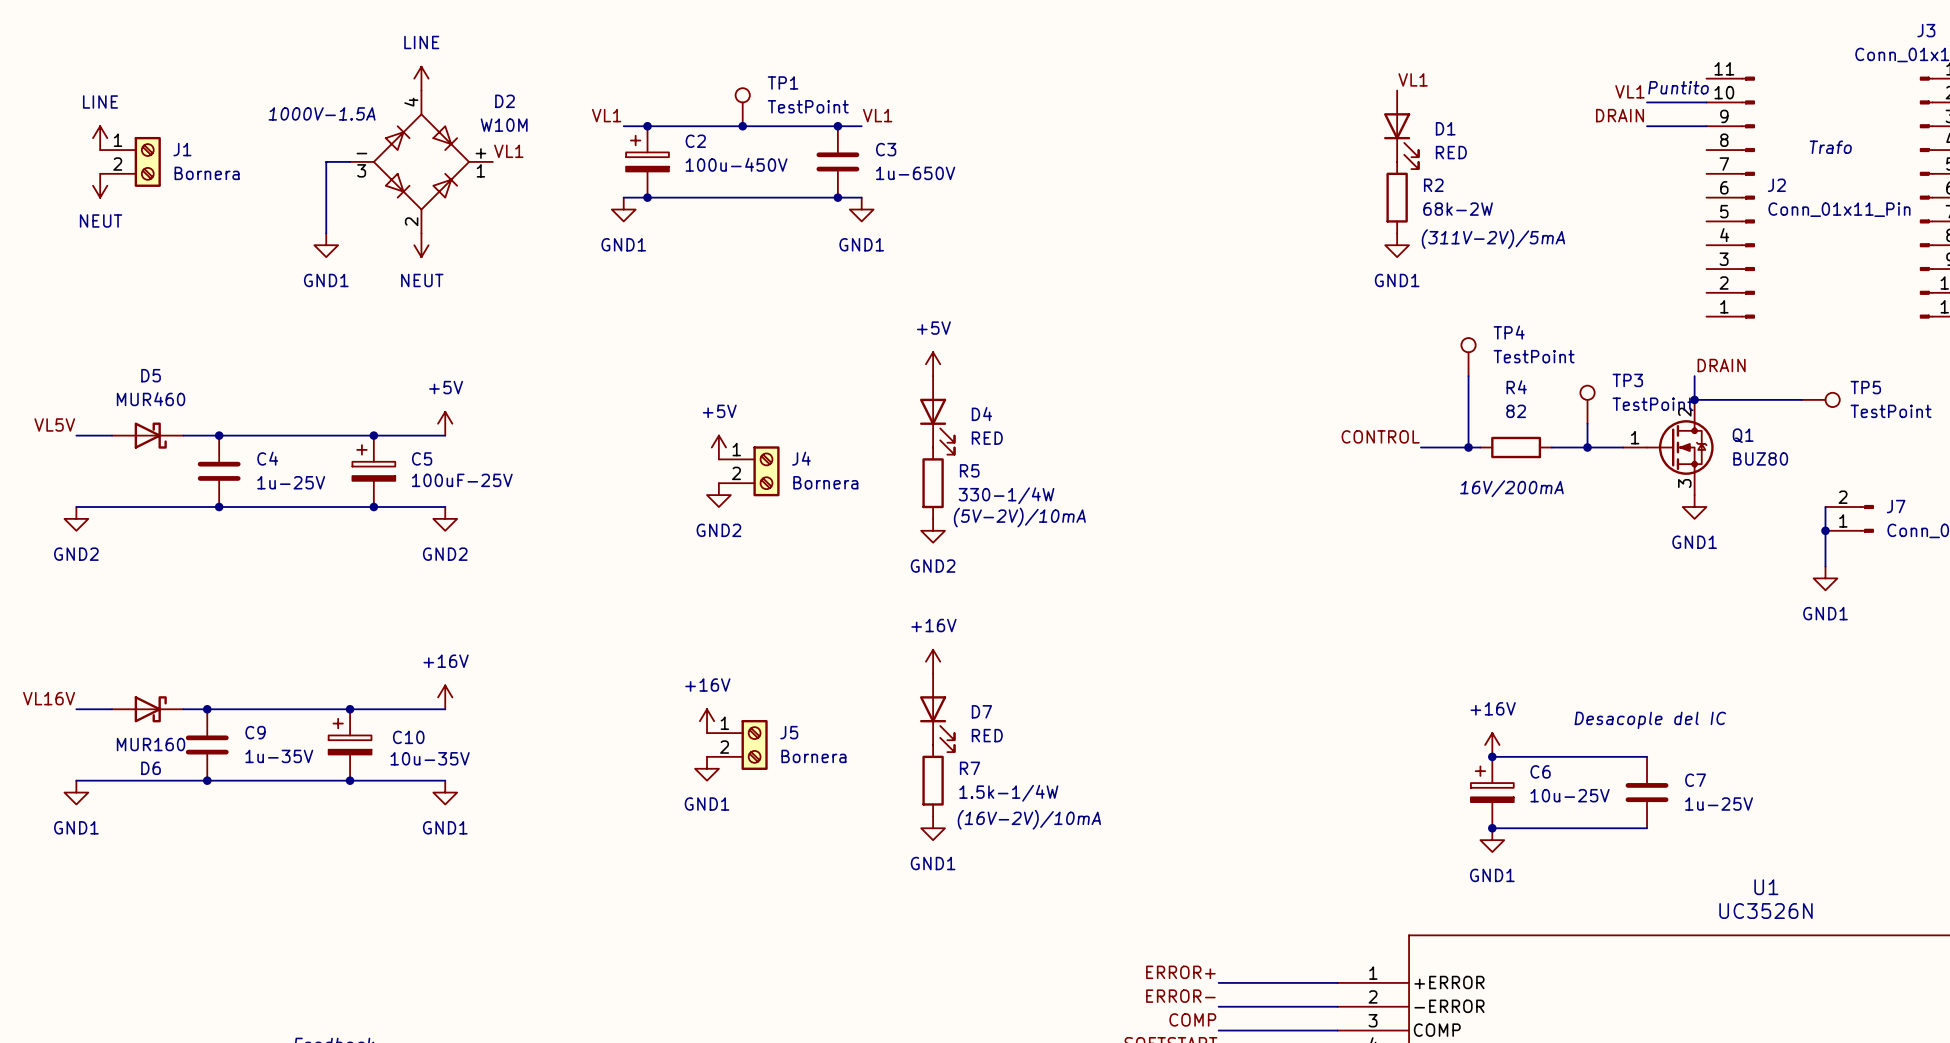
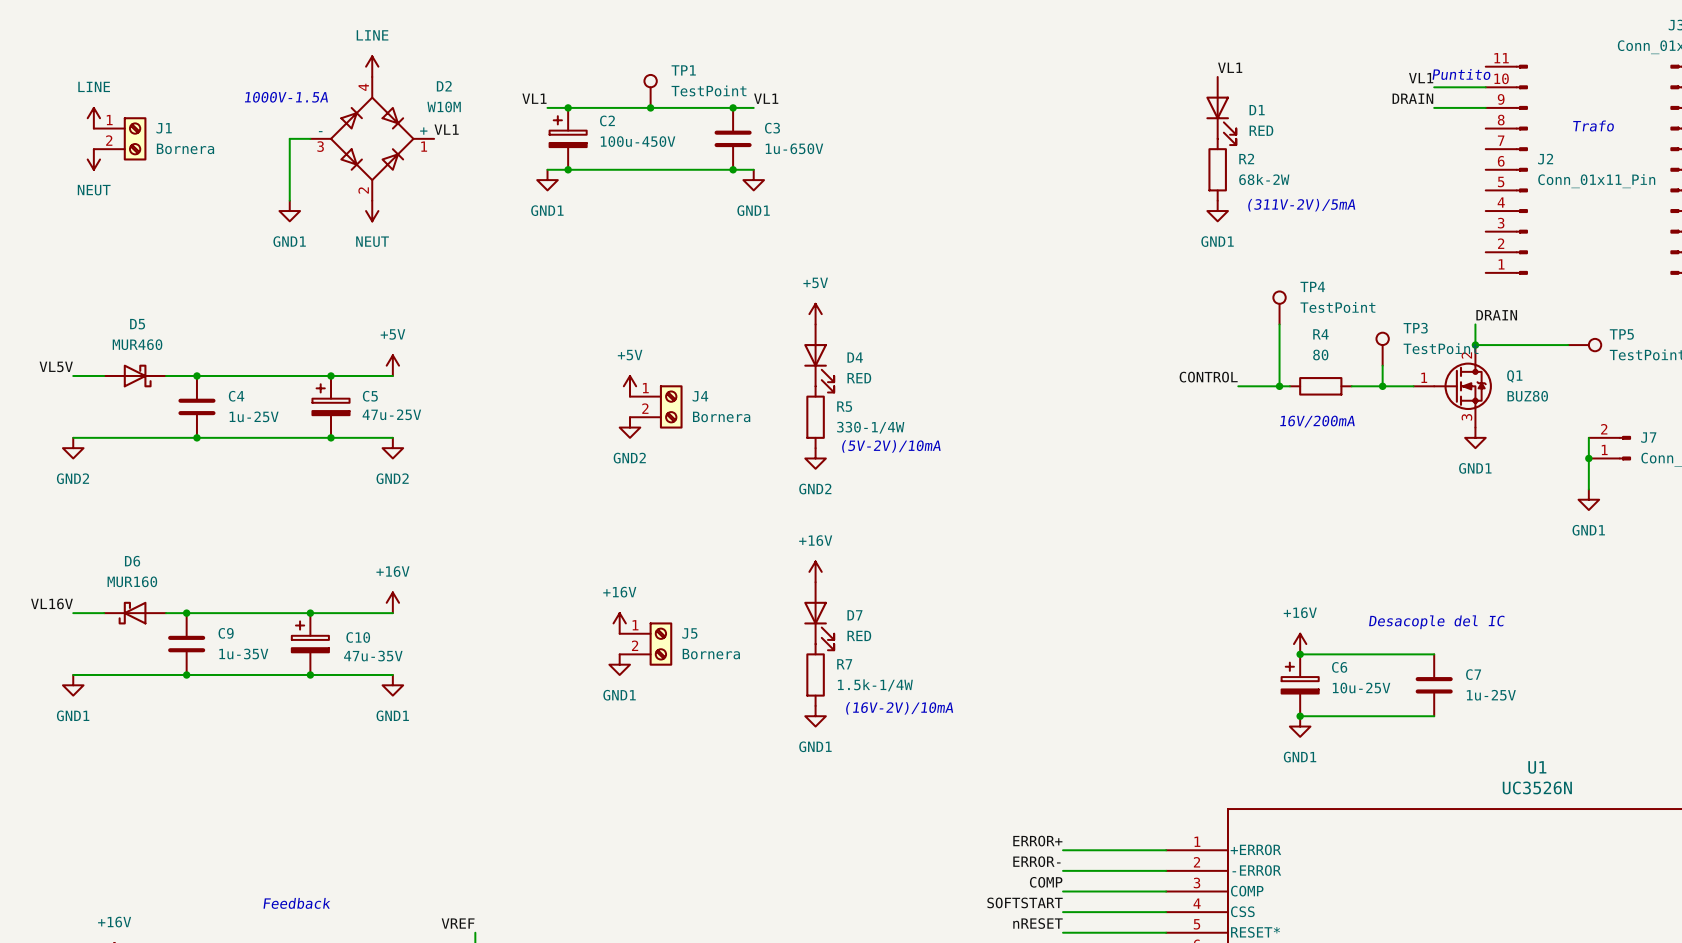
R4 value: 82 (1516, 411) -> 80 (1320, 354)
C5 value: 100uF-25V (462, 480) -> 47u-25V (391, 414)
D6 rotation: 0° (150, 709) -> 180° (132, 613)
C10 value: 10u-35V (430, 758) -> 47u-35V (373, 656)

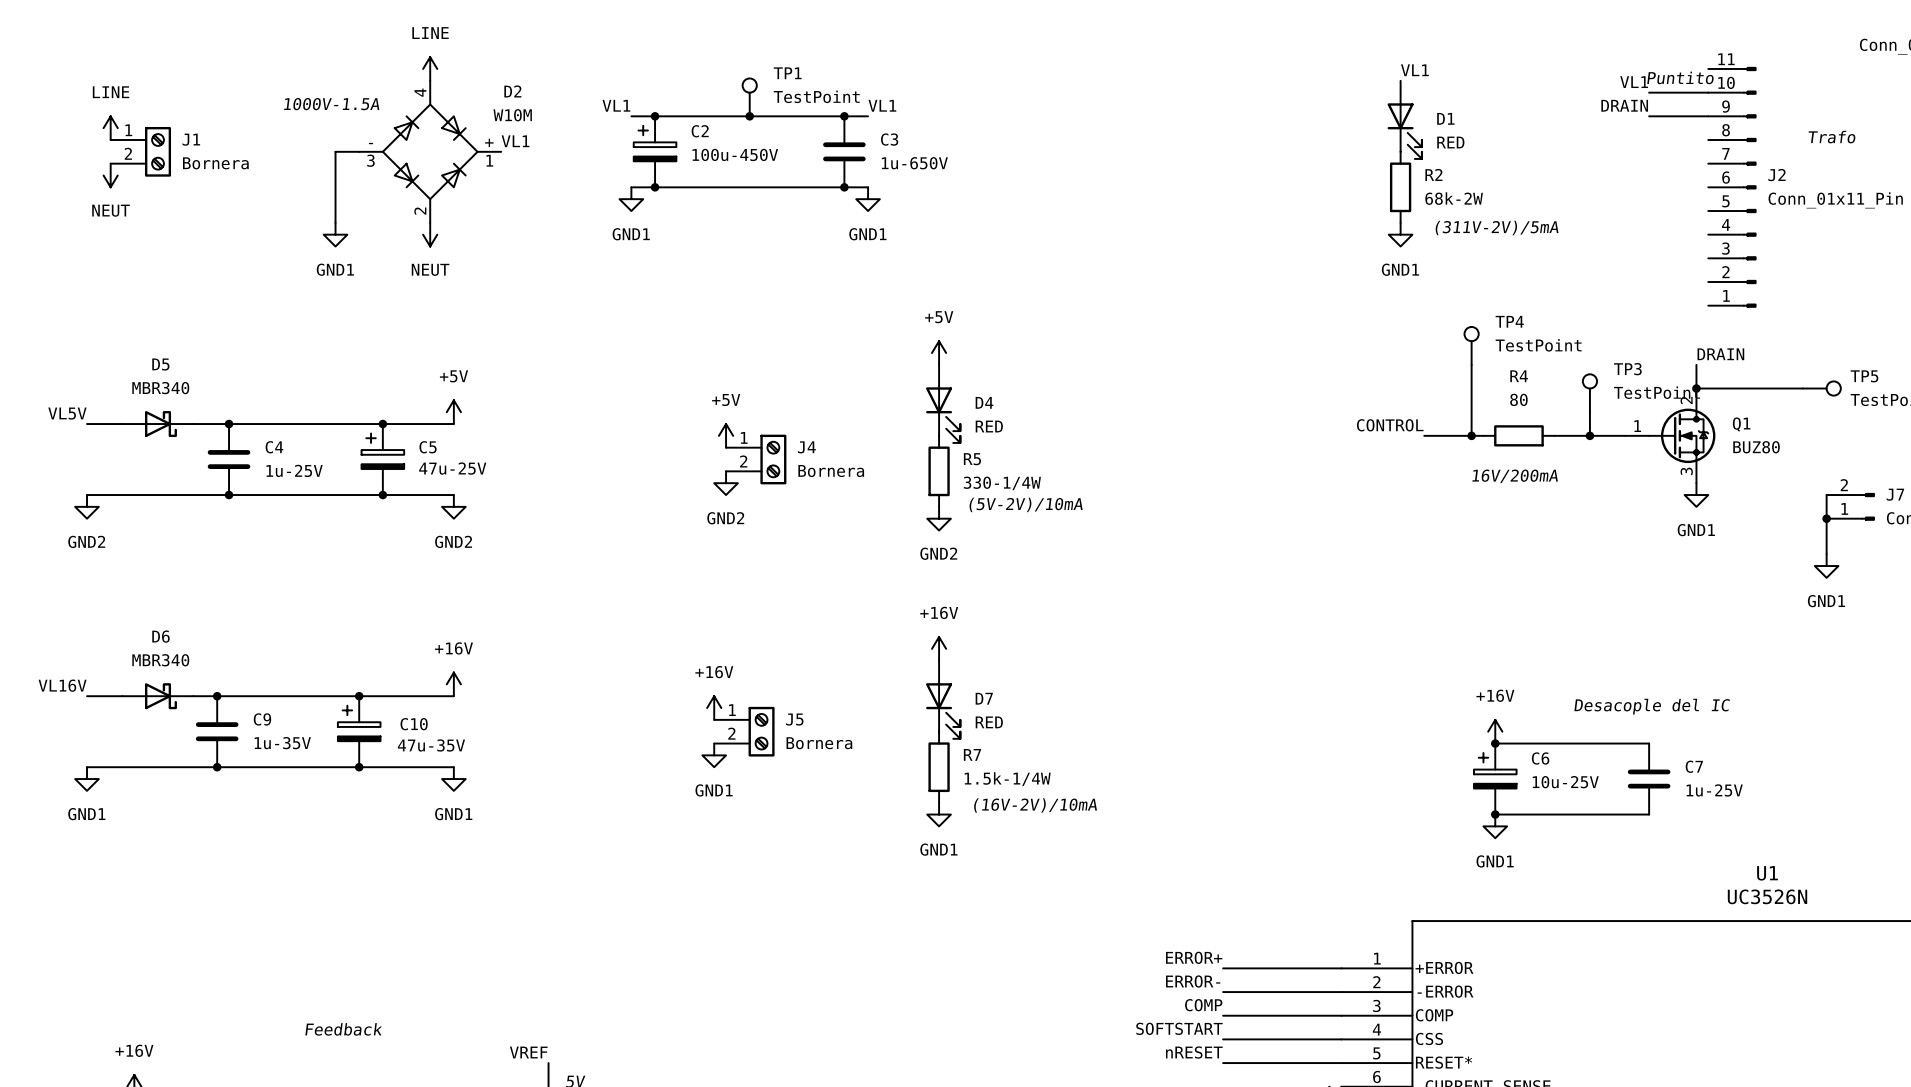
D5 value: MUR460 (137, 344) -> MBR340 (160, 388)
D6 value: MUR160 (132, 581) -> MBR340 (160, 660)
D6 flip: as is (132, 613) -> left-right (160, 696)

